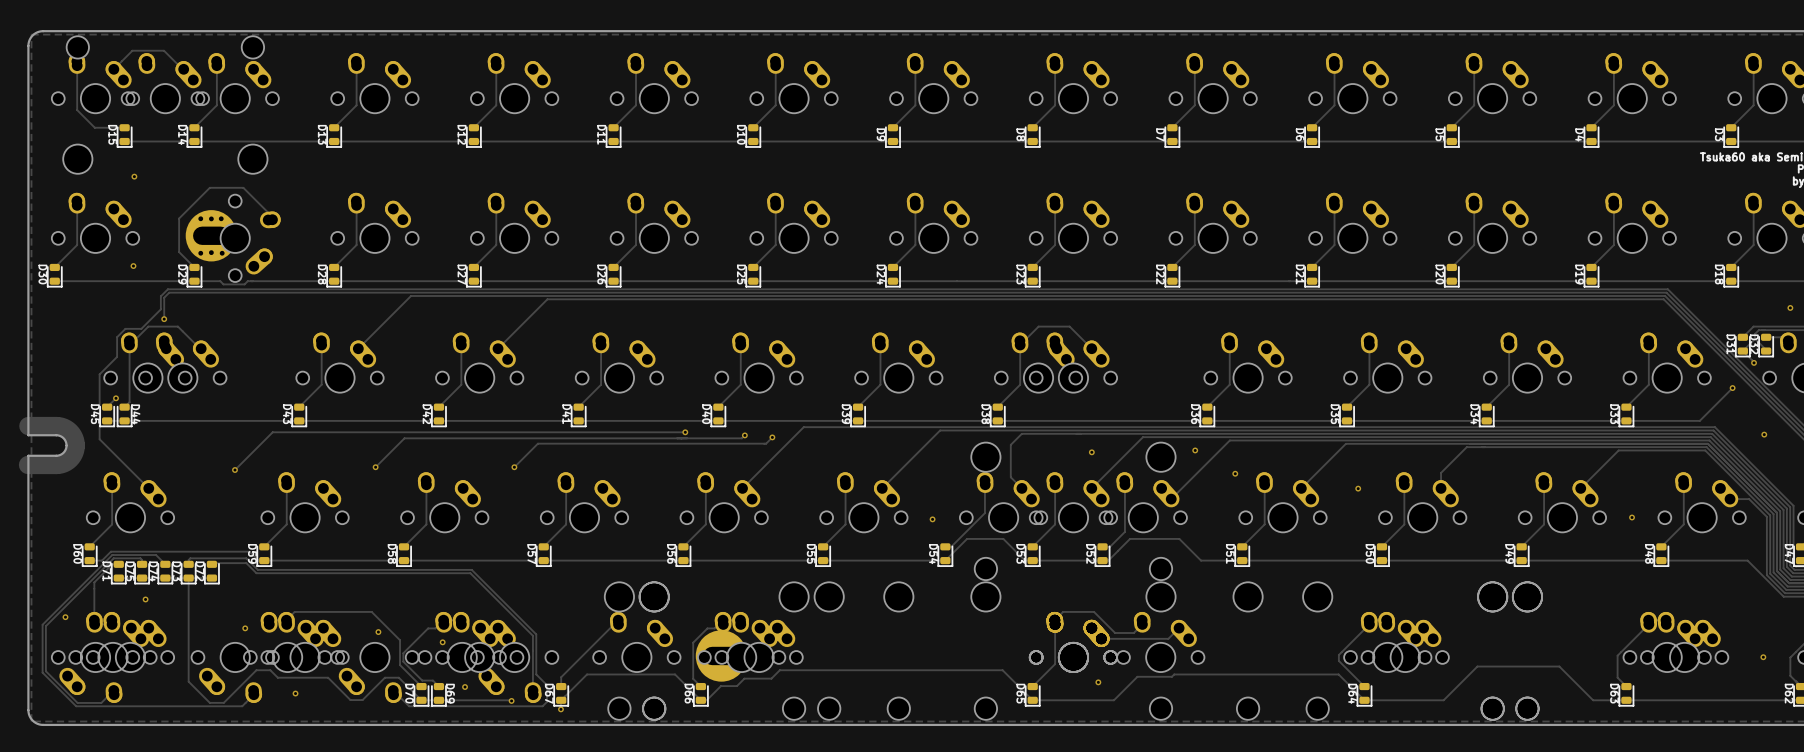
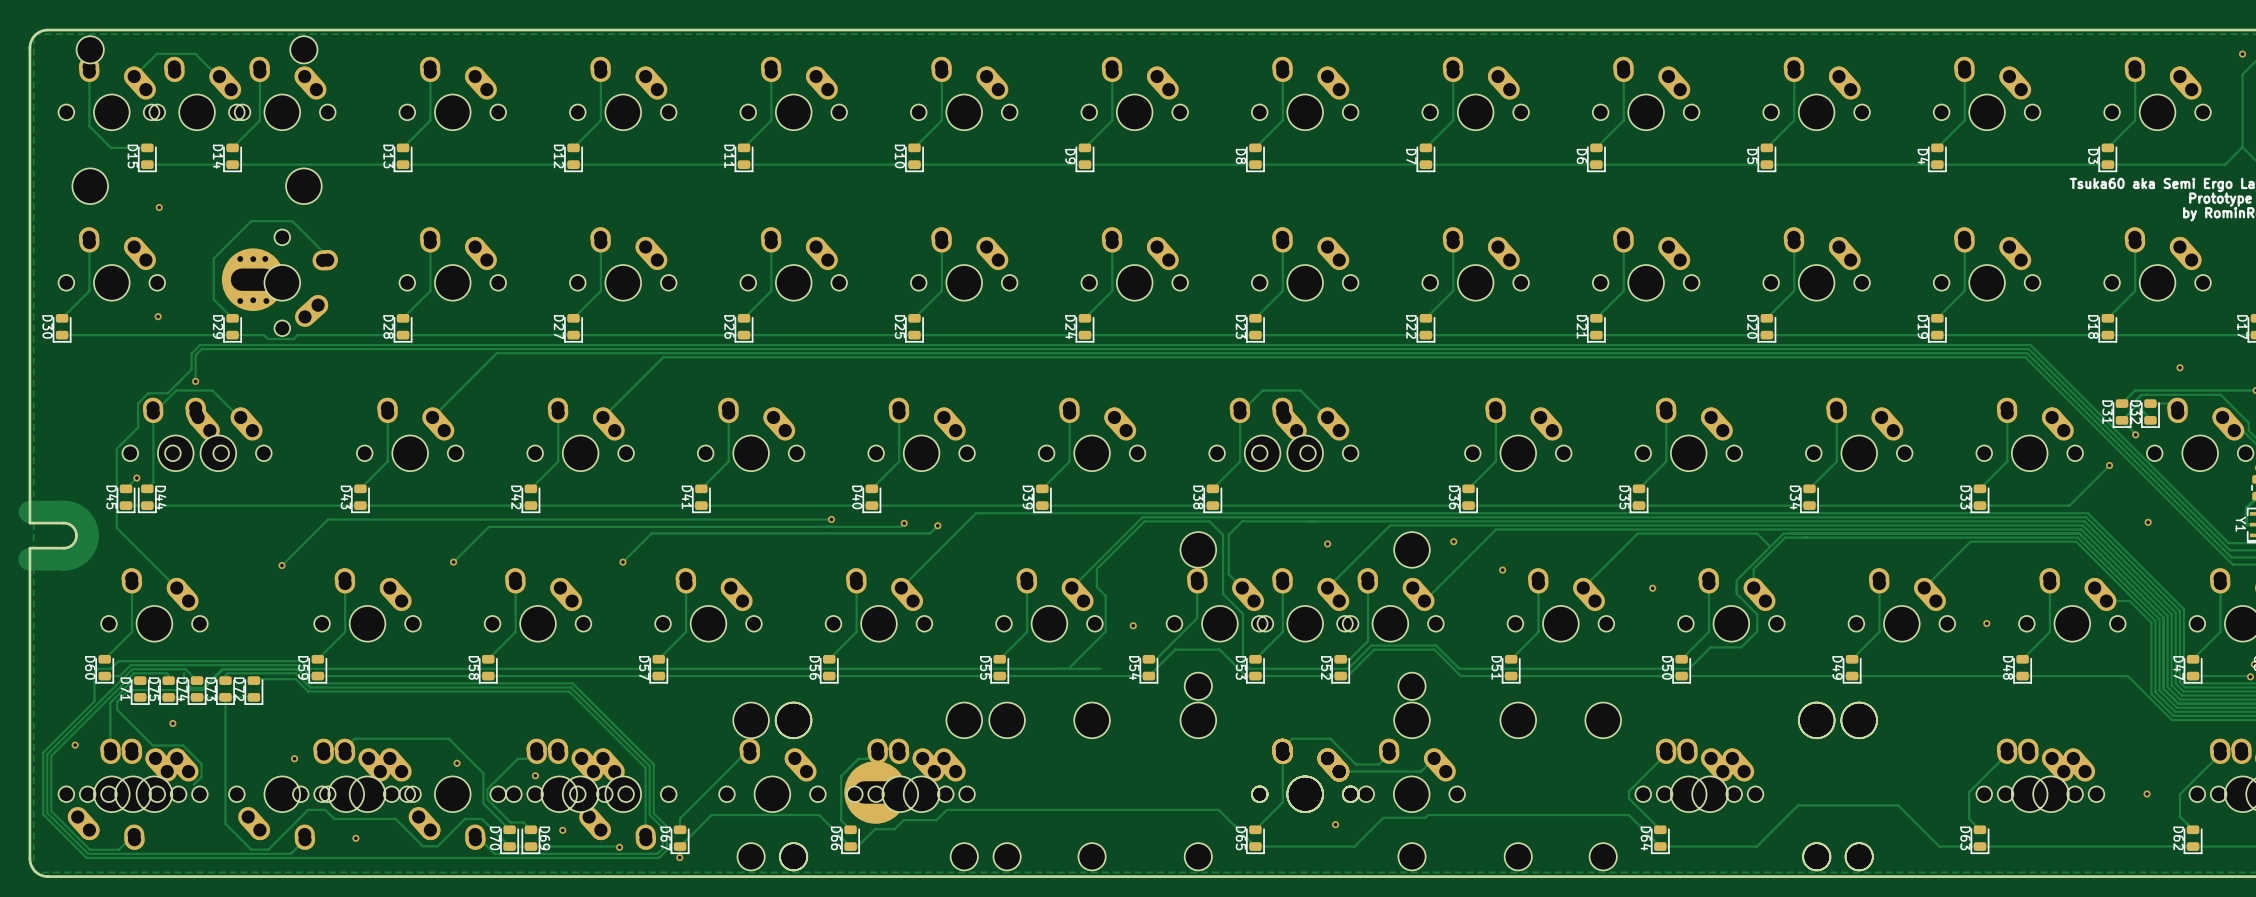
track: (1465, 443) (1443, 443) -> (1770, 546) (1757, 533)
track: none -> (1783, 533) (1736, 580) (1736, 593) (1757, 614) (1757, 631) (1741, 647) (1710, 647) (1689, 668) (1459, 668) (1436, 645) (1371, 645) (1348, 668) (1249, 668) (1243, 662) (1243, 613) (1223, 593) (1223, 534) (1209, 521) (1144, 521) (1096, 568) (1096, 587) (1105, 595) (1105, 631) (1068, 668)
track: none -> (1100, 668) (309, 668) (301, 661) (118, 661) (110, 668) (98, 668) (94, 672) (94, 701) (43, 752) (43, 814) (86, 857) (659, 857) (666, 850) (666, 826) (653, 813) (653, 764) (572, 683) (311, 683) (297, 669) (221, 669) (203, 687) (190, 687) (184, 681) (184, 673)
track: none -> (223, 669) (202, 690) (128, 690) (117, 701) (117, 709) (152, 745) (183, 745) (201, 763) (201, 776) (193, 784)

